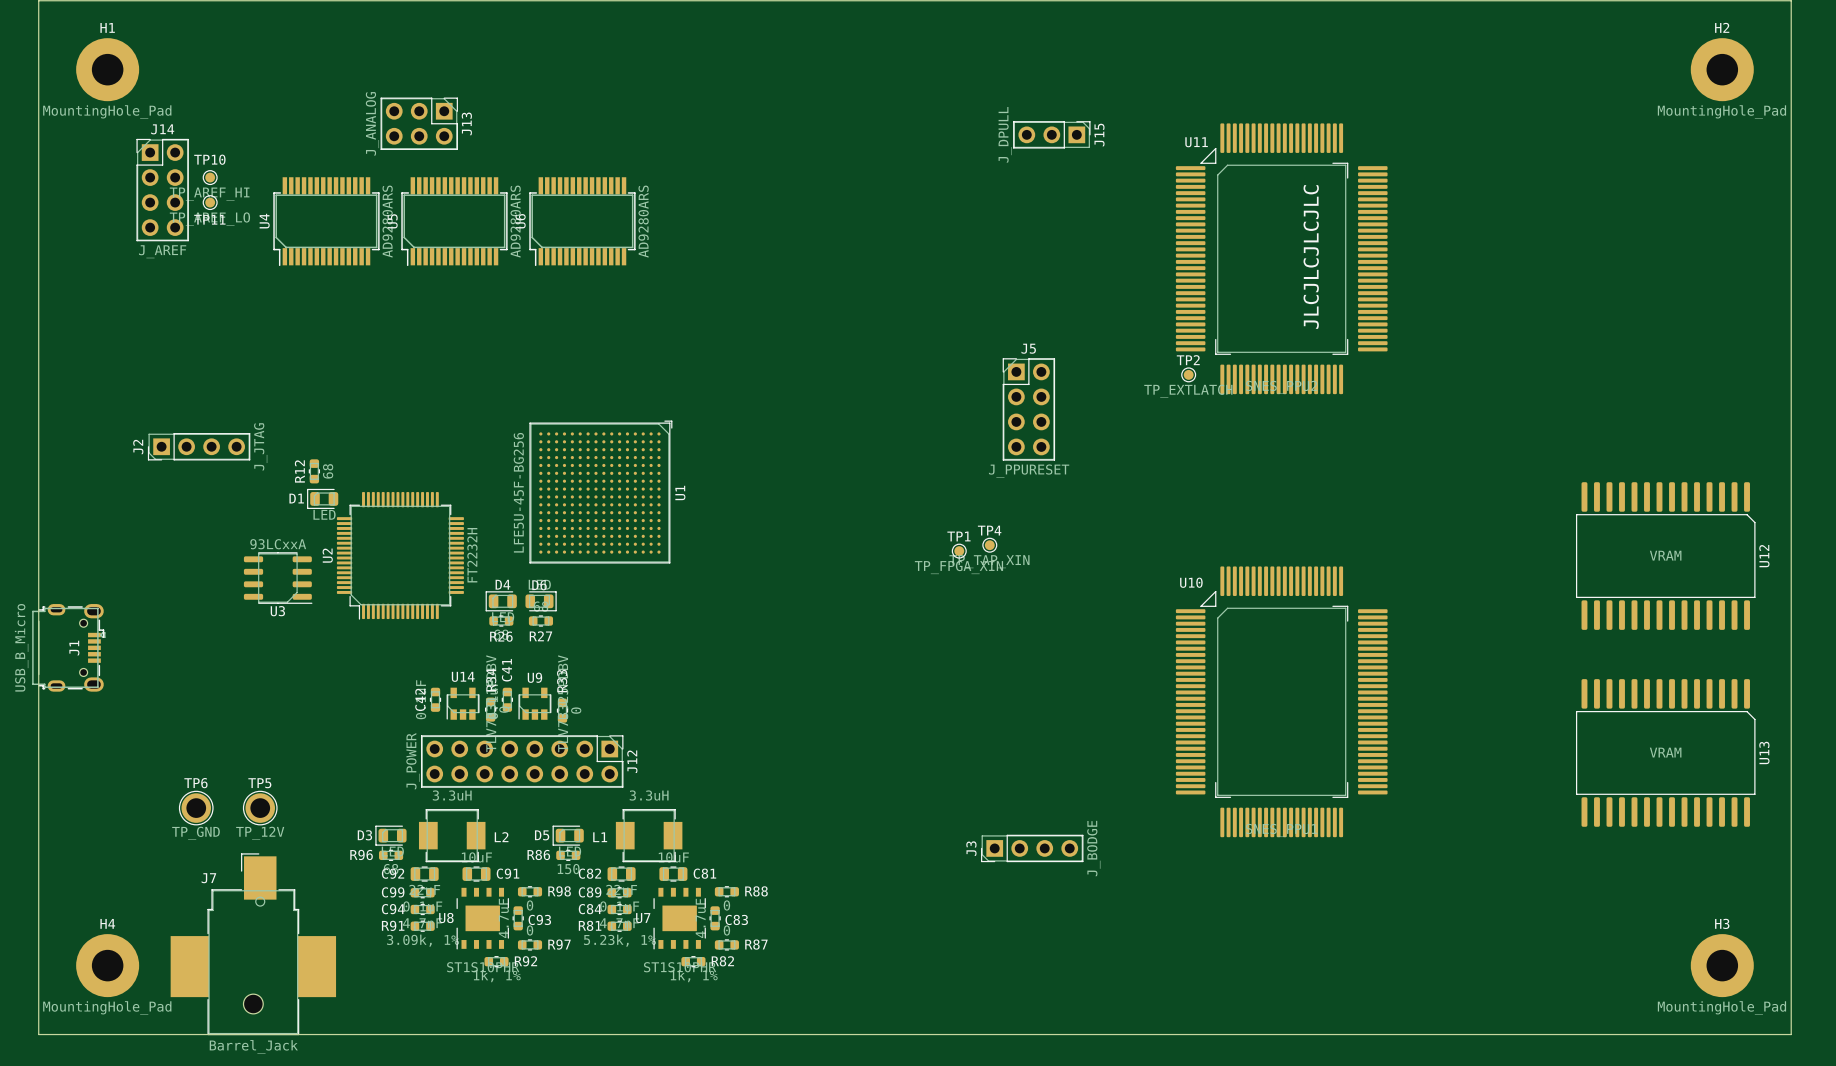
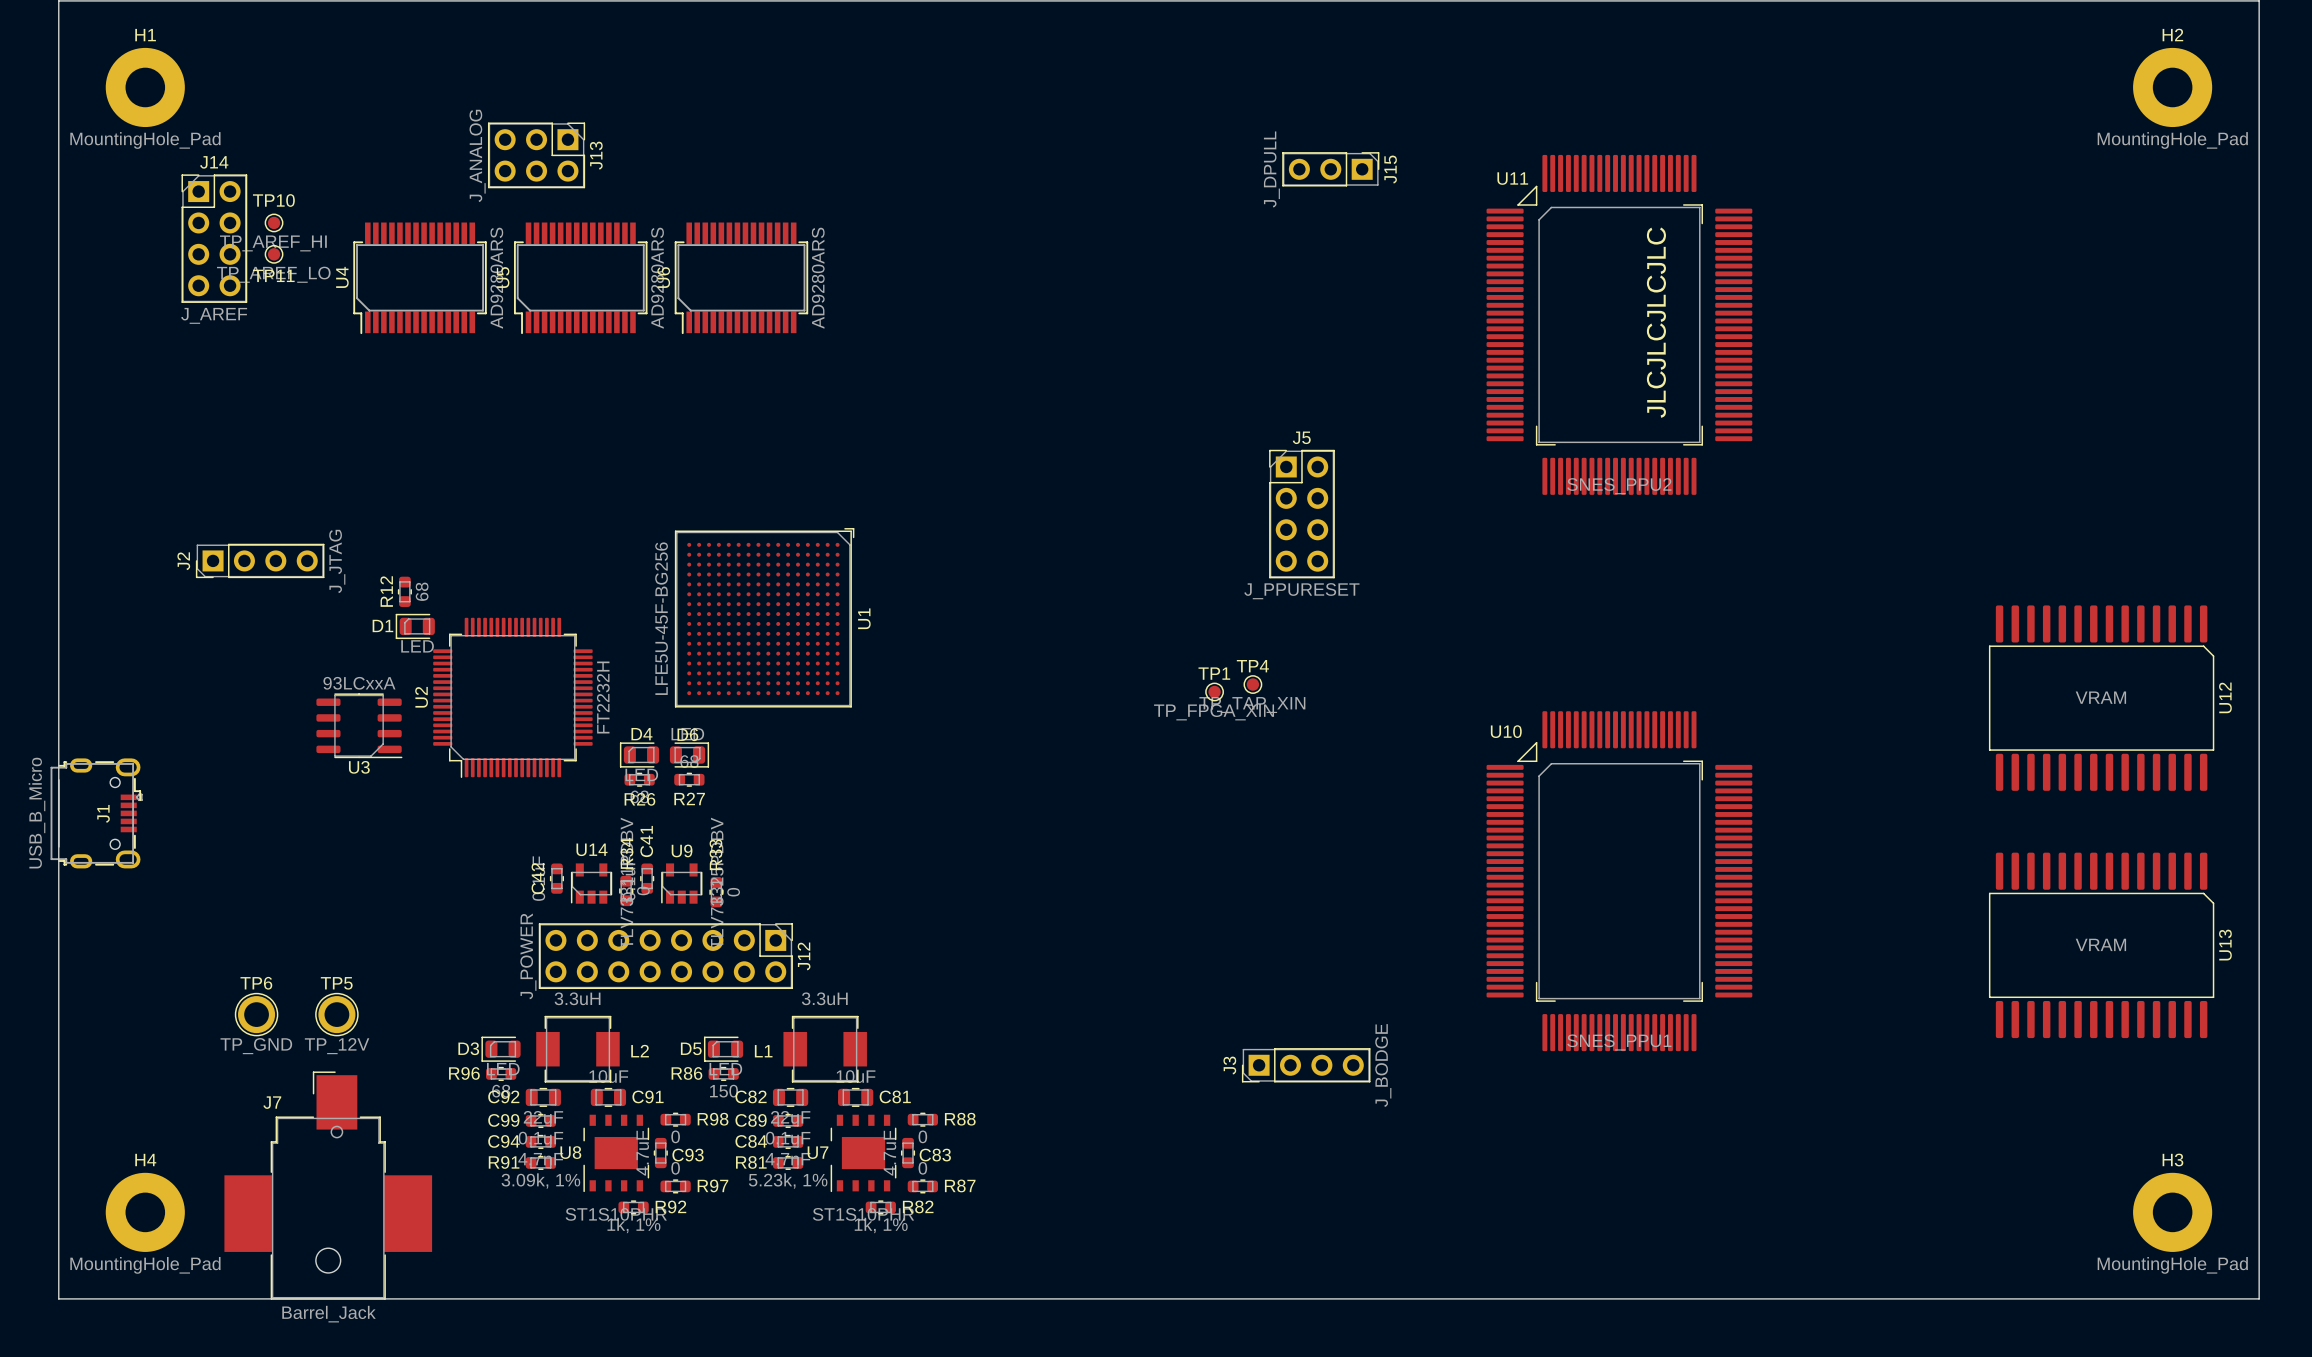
TP2: TP_EXTLATCH (1188, 374) -> none

